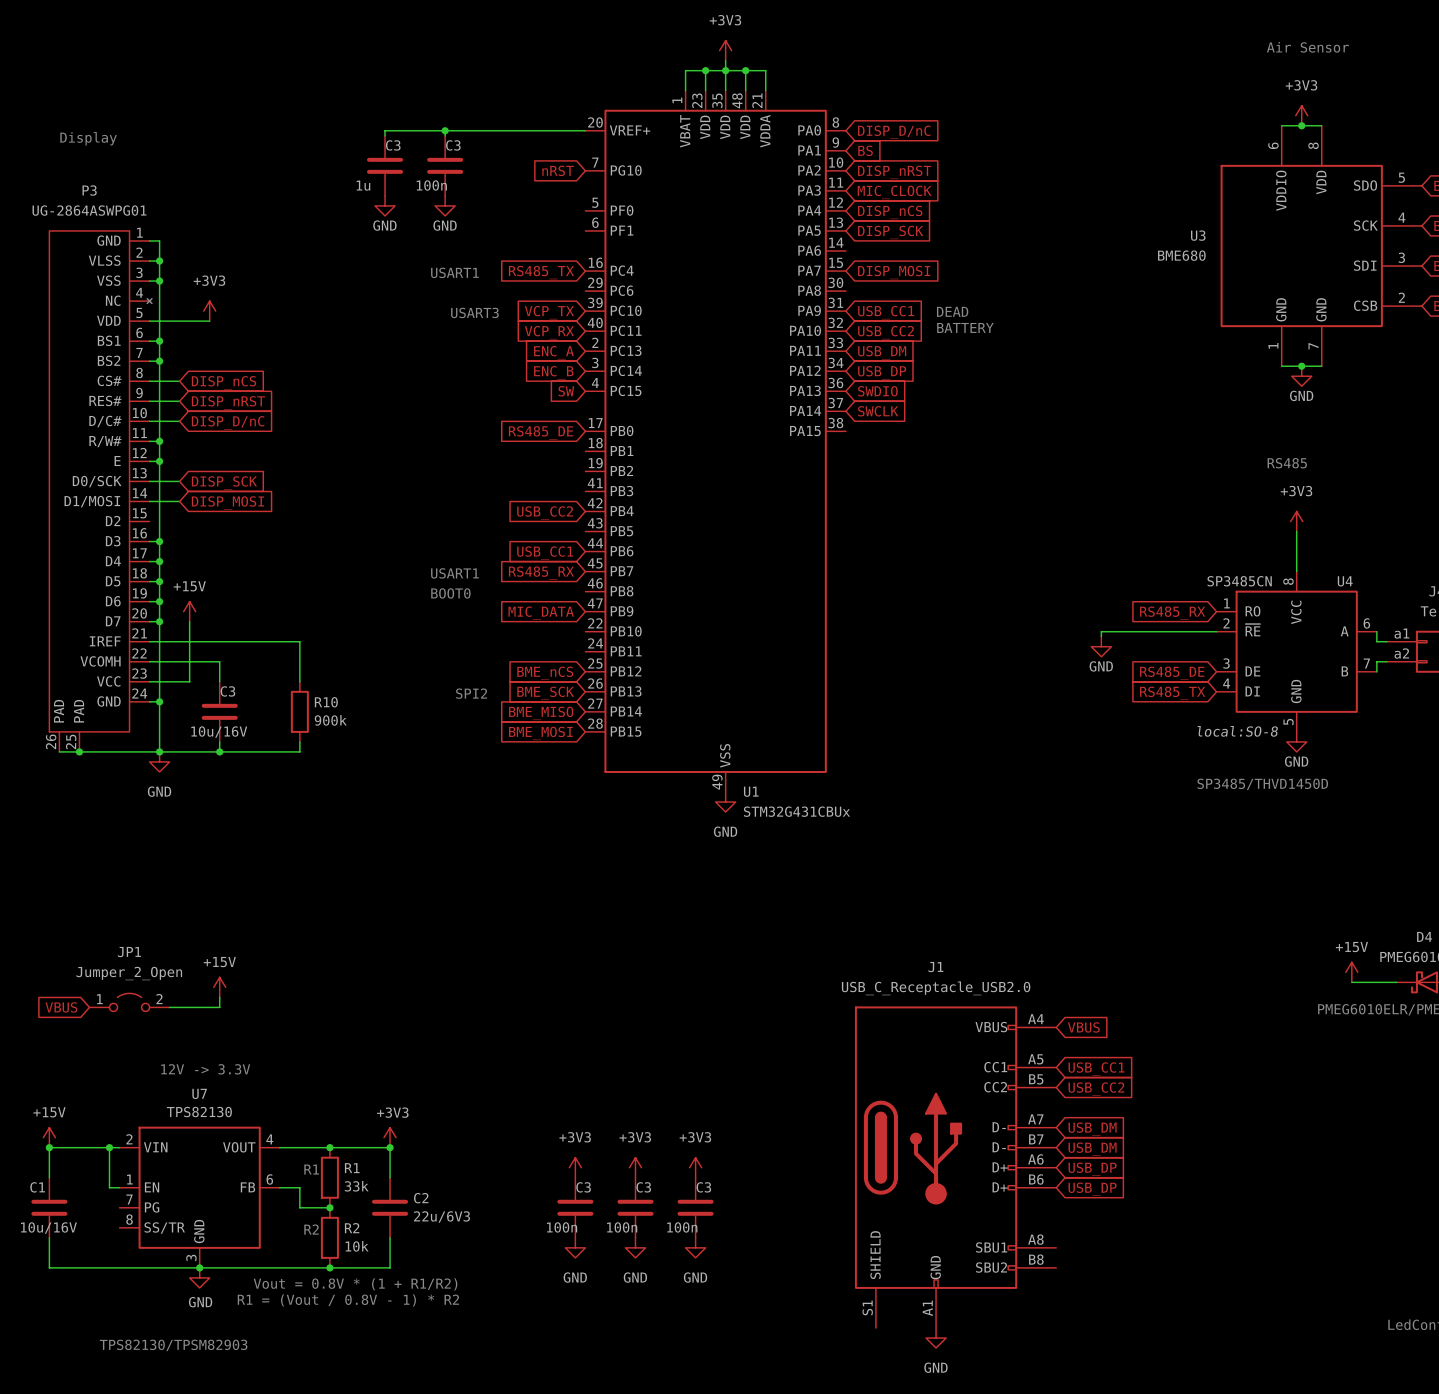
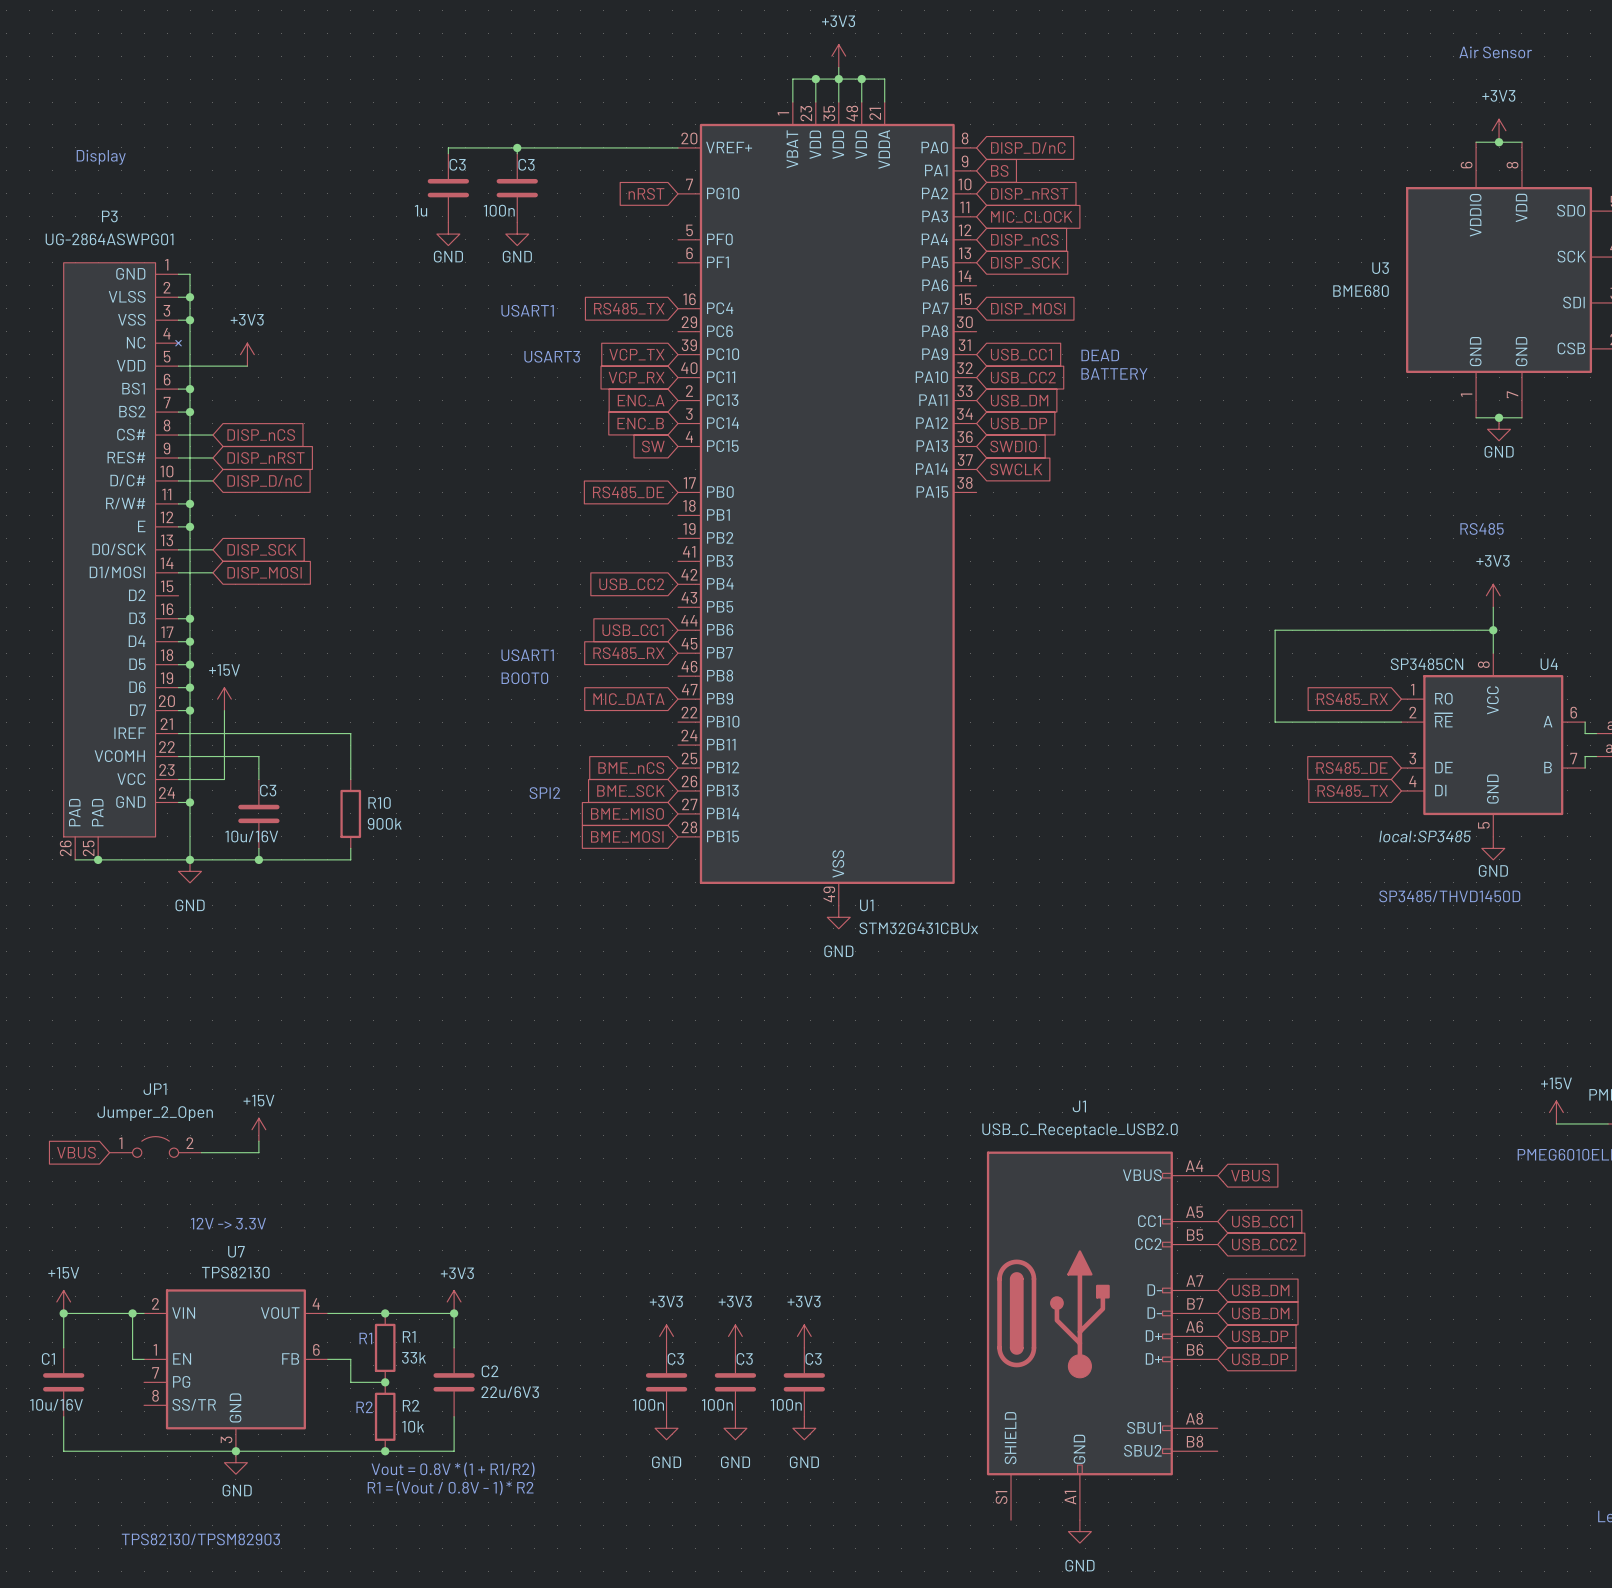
junction: none -> (1493, 630)
wire: (1106, 631) (1101, 631) (1101, 636) -> (1275, 722) (1275, 630) (1493, 630)
power symbol: GND (1101, 646) -> none
U4 text: local:SO-8 (1237, 731) -> local:SP3485 (1425, 836)

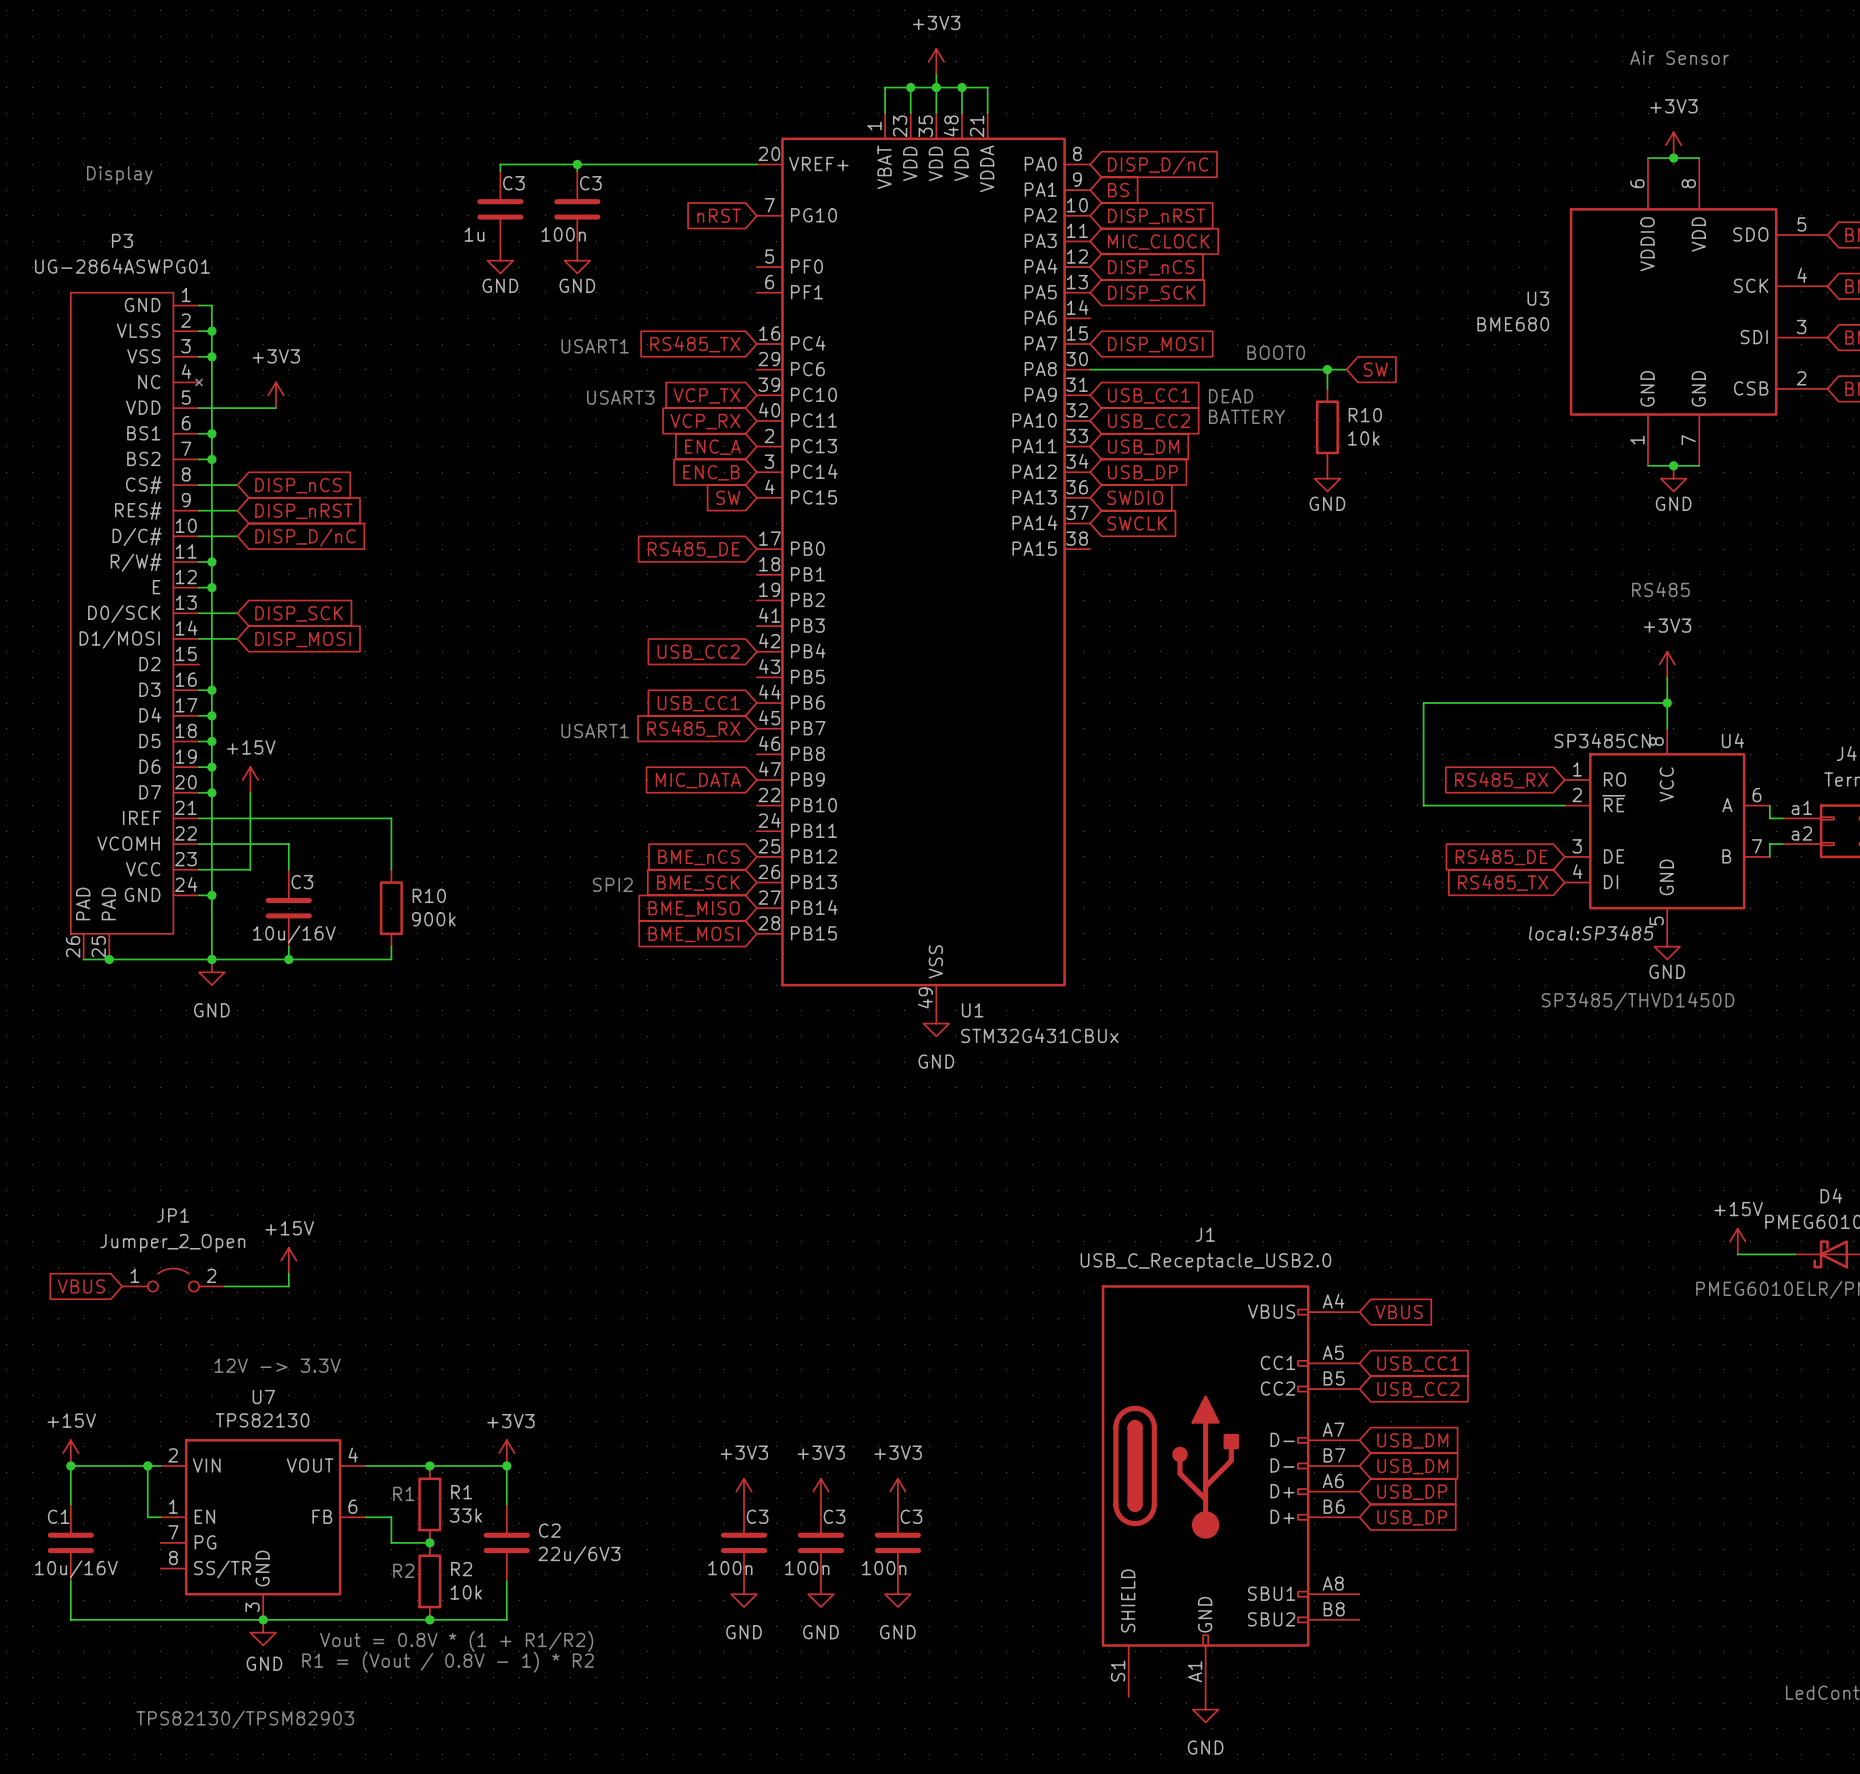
text: none -> BOOT0 (1276, 352)
wire: none -> (1090, 369) (1346, 369)
wire: none -> (1327, 369) (1327, 388)
junction: none -> (1327, 369)
global label: none -> SW (1375, 369)
R10: none -> 10k (1327, 427)
power symbol: none -> GND (1327, 478)
text: BOOT0 (524, 678) -> none

